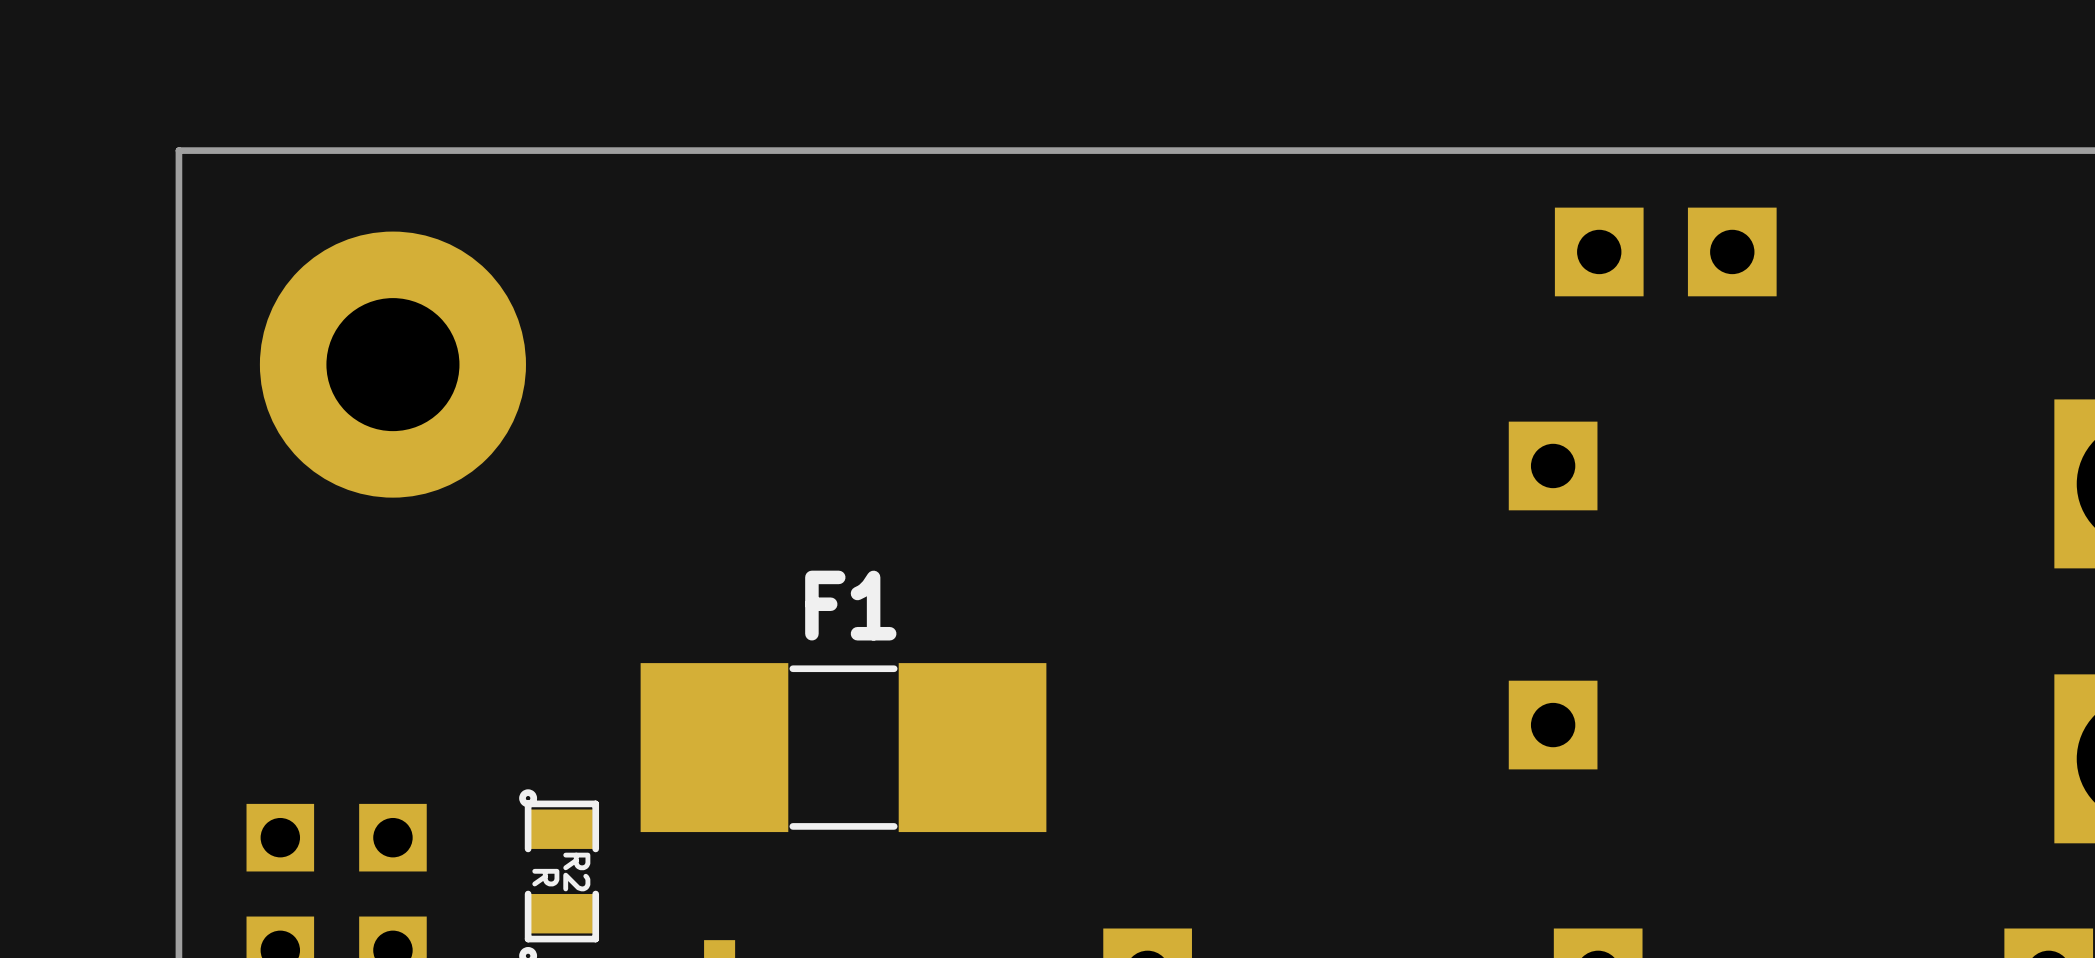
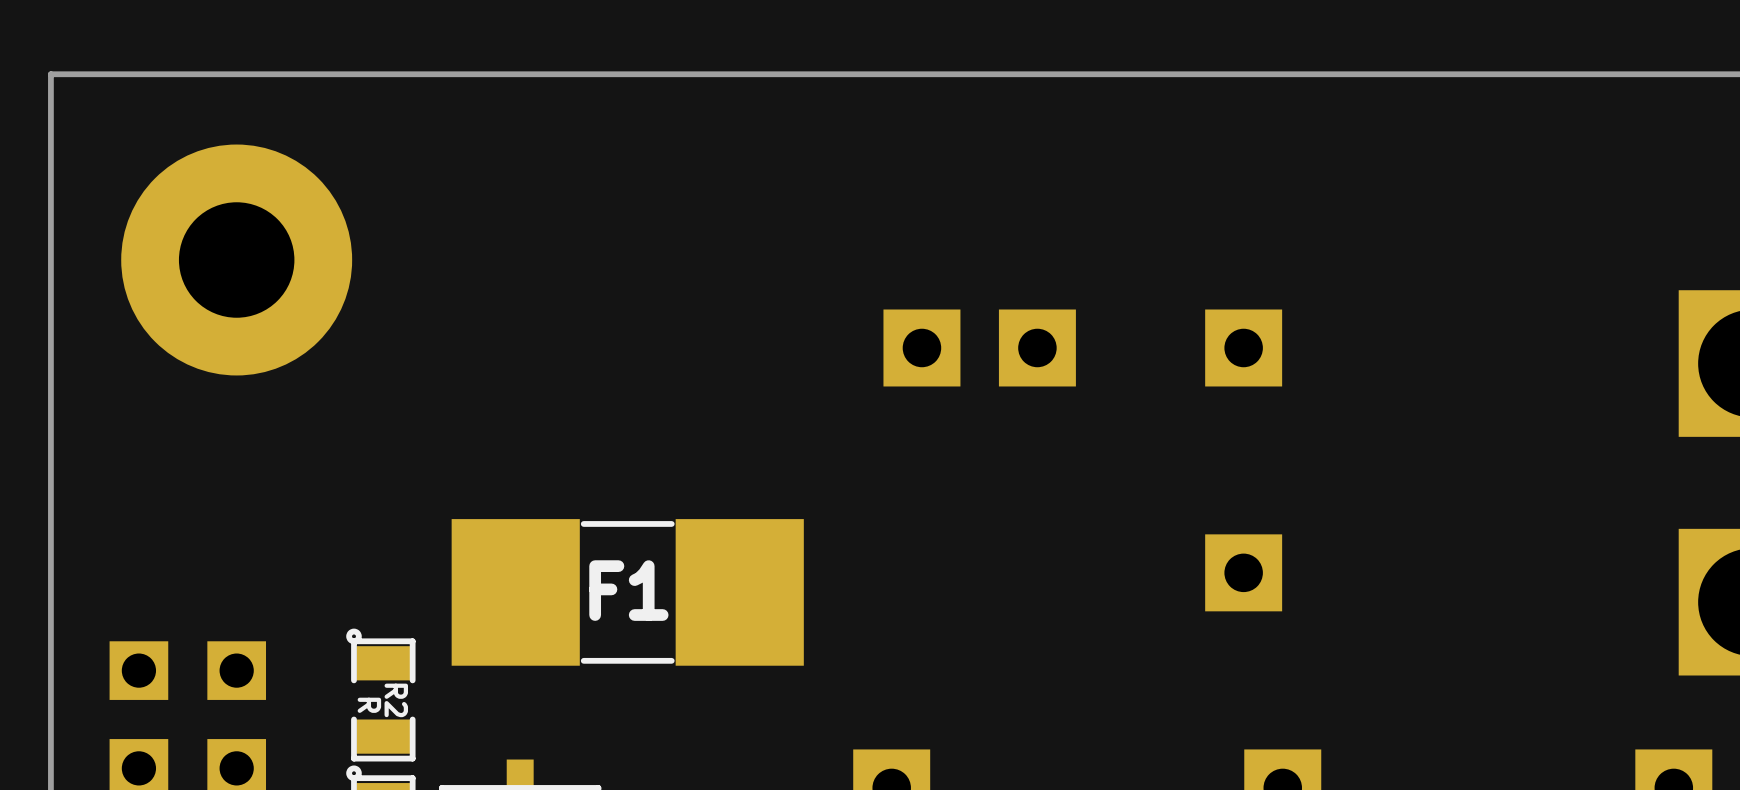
part position: (1665, 251) -> (979, 347)
F1 name position: F1 (850, 605) -> F1 (628, 590)

